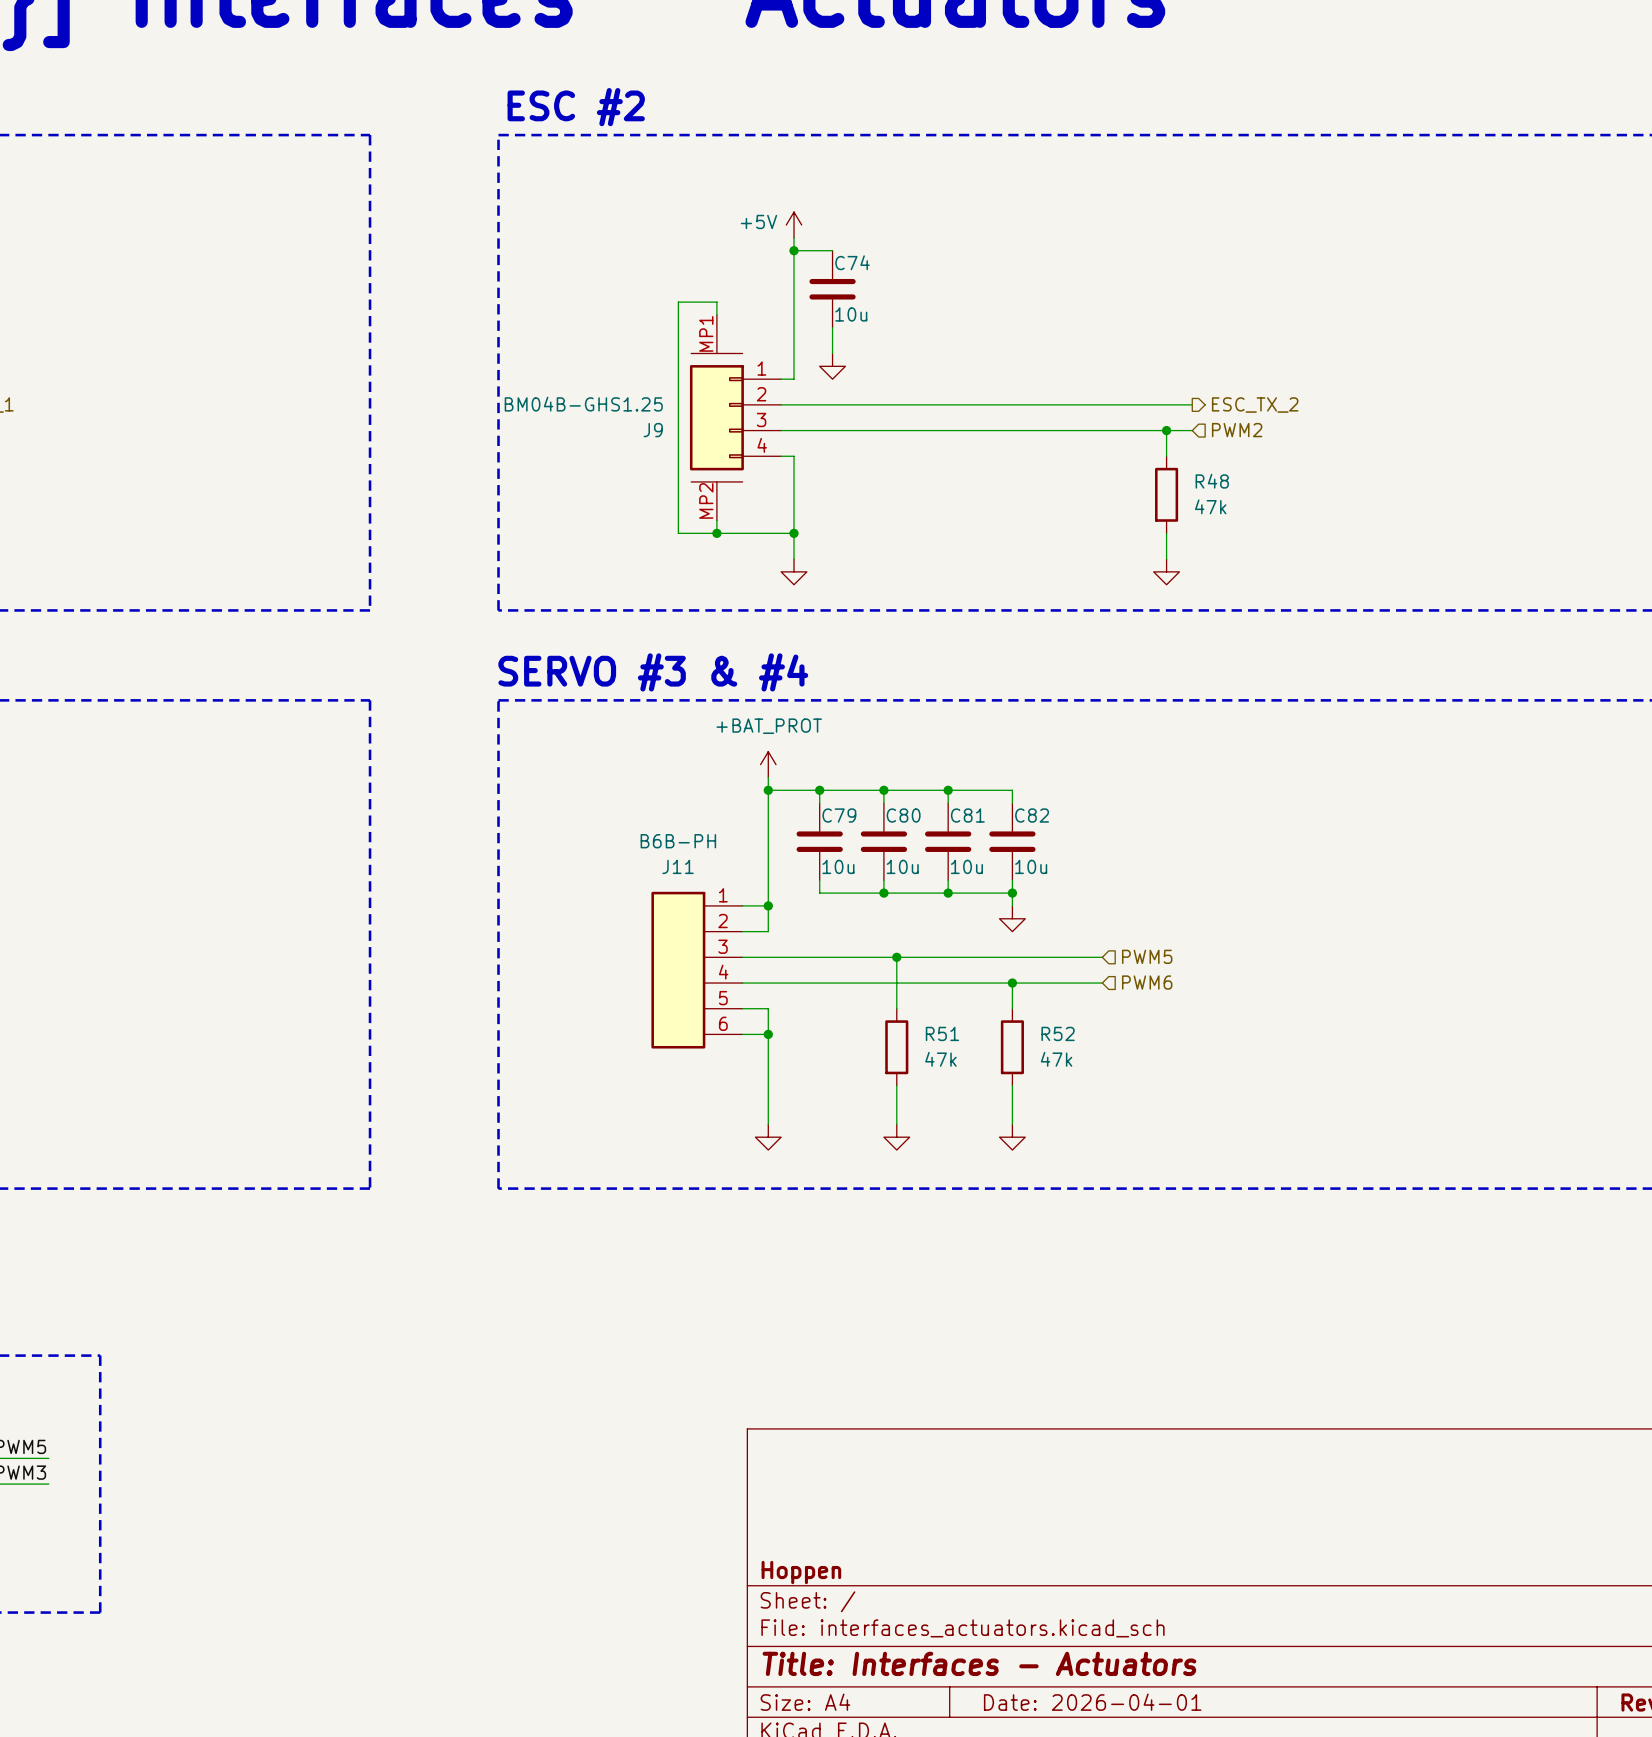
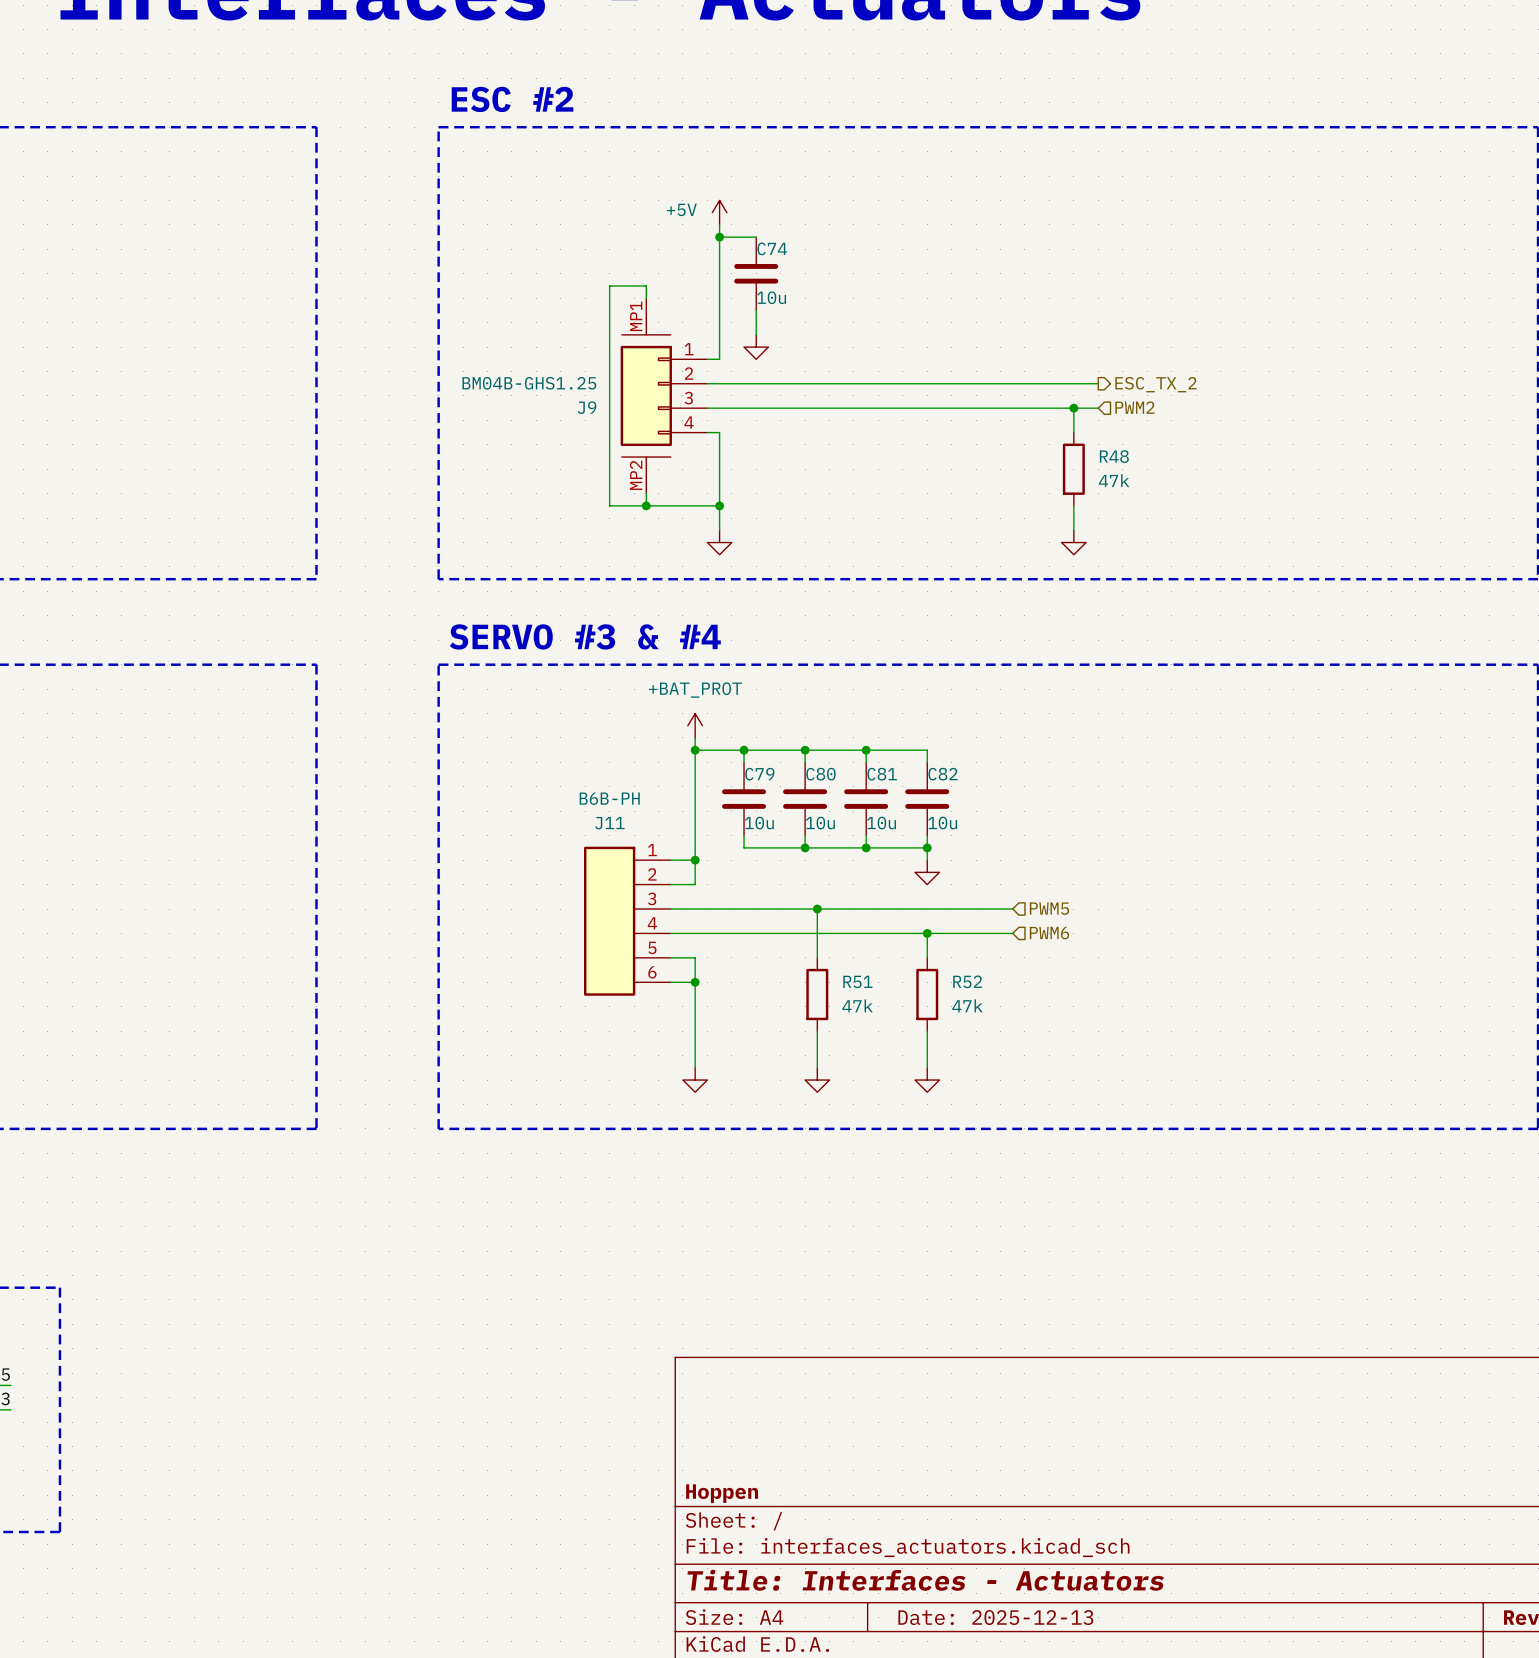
title block: Date: 2026-04-01 (1092, 1702) -> Date: 2025-12-13 (995, 1617)

